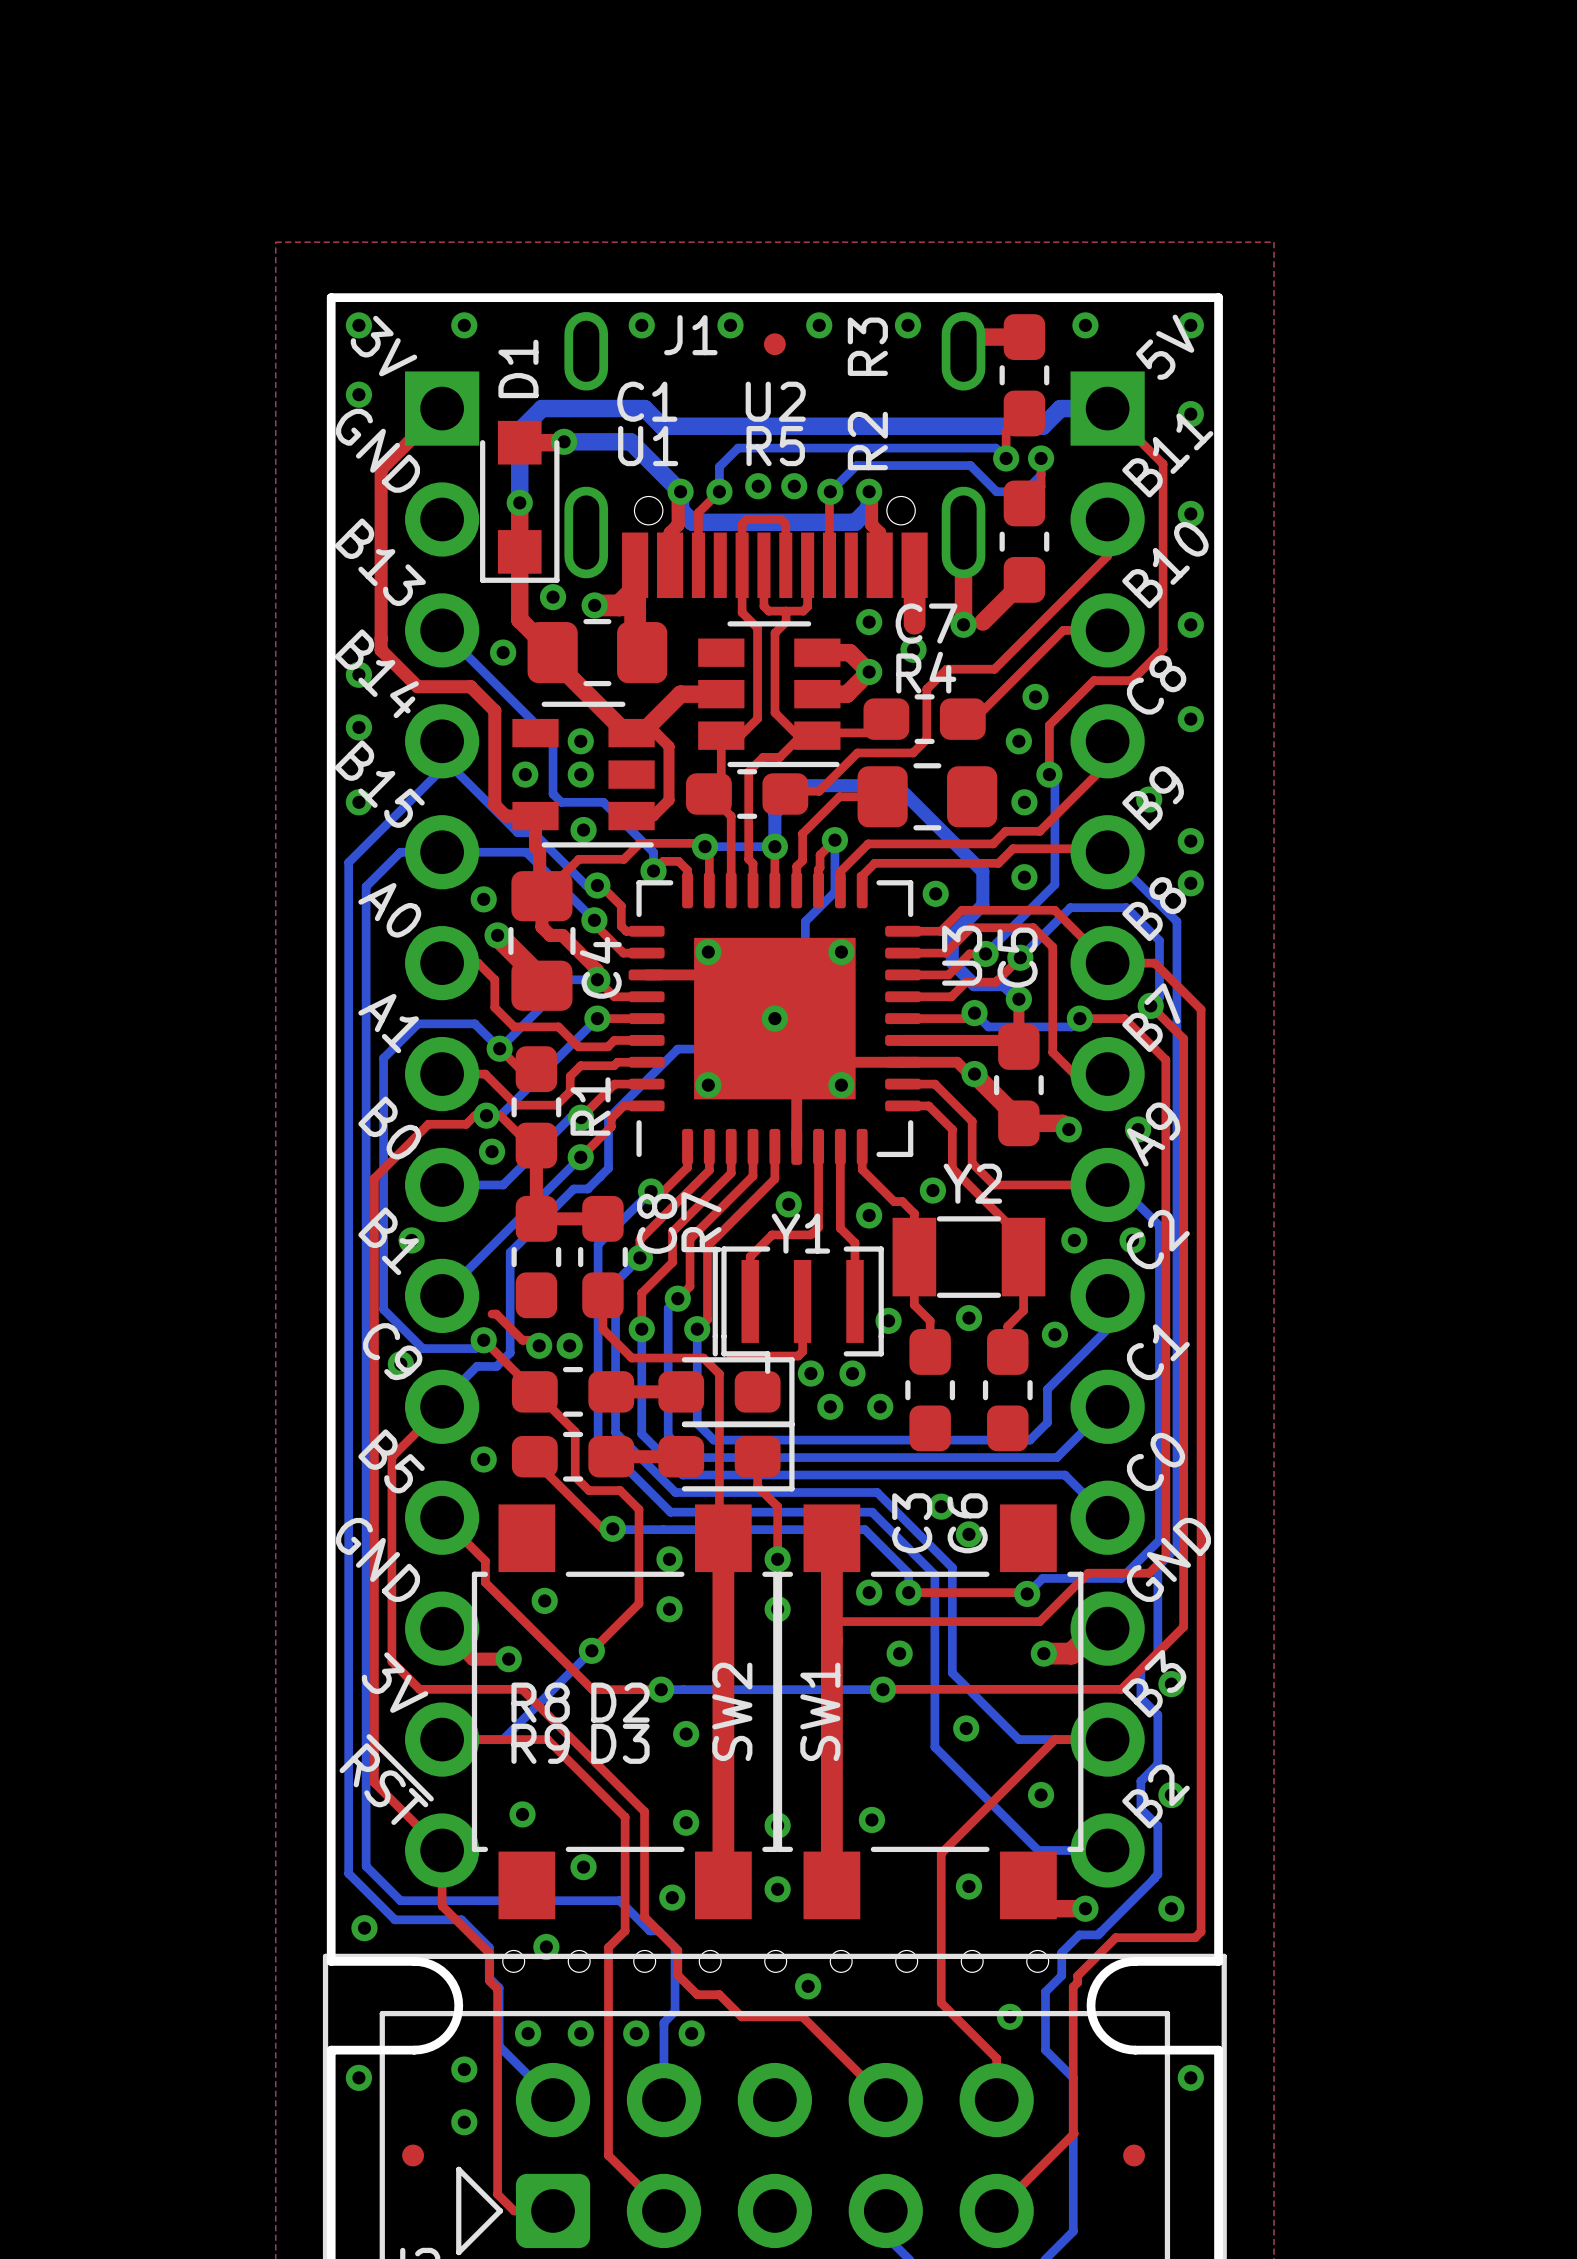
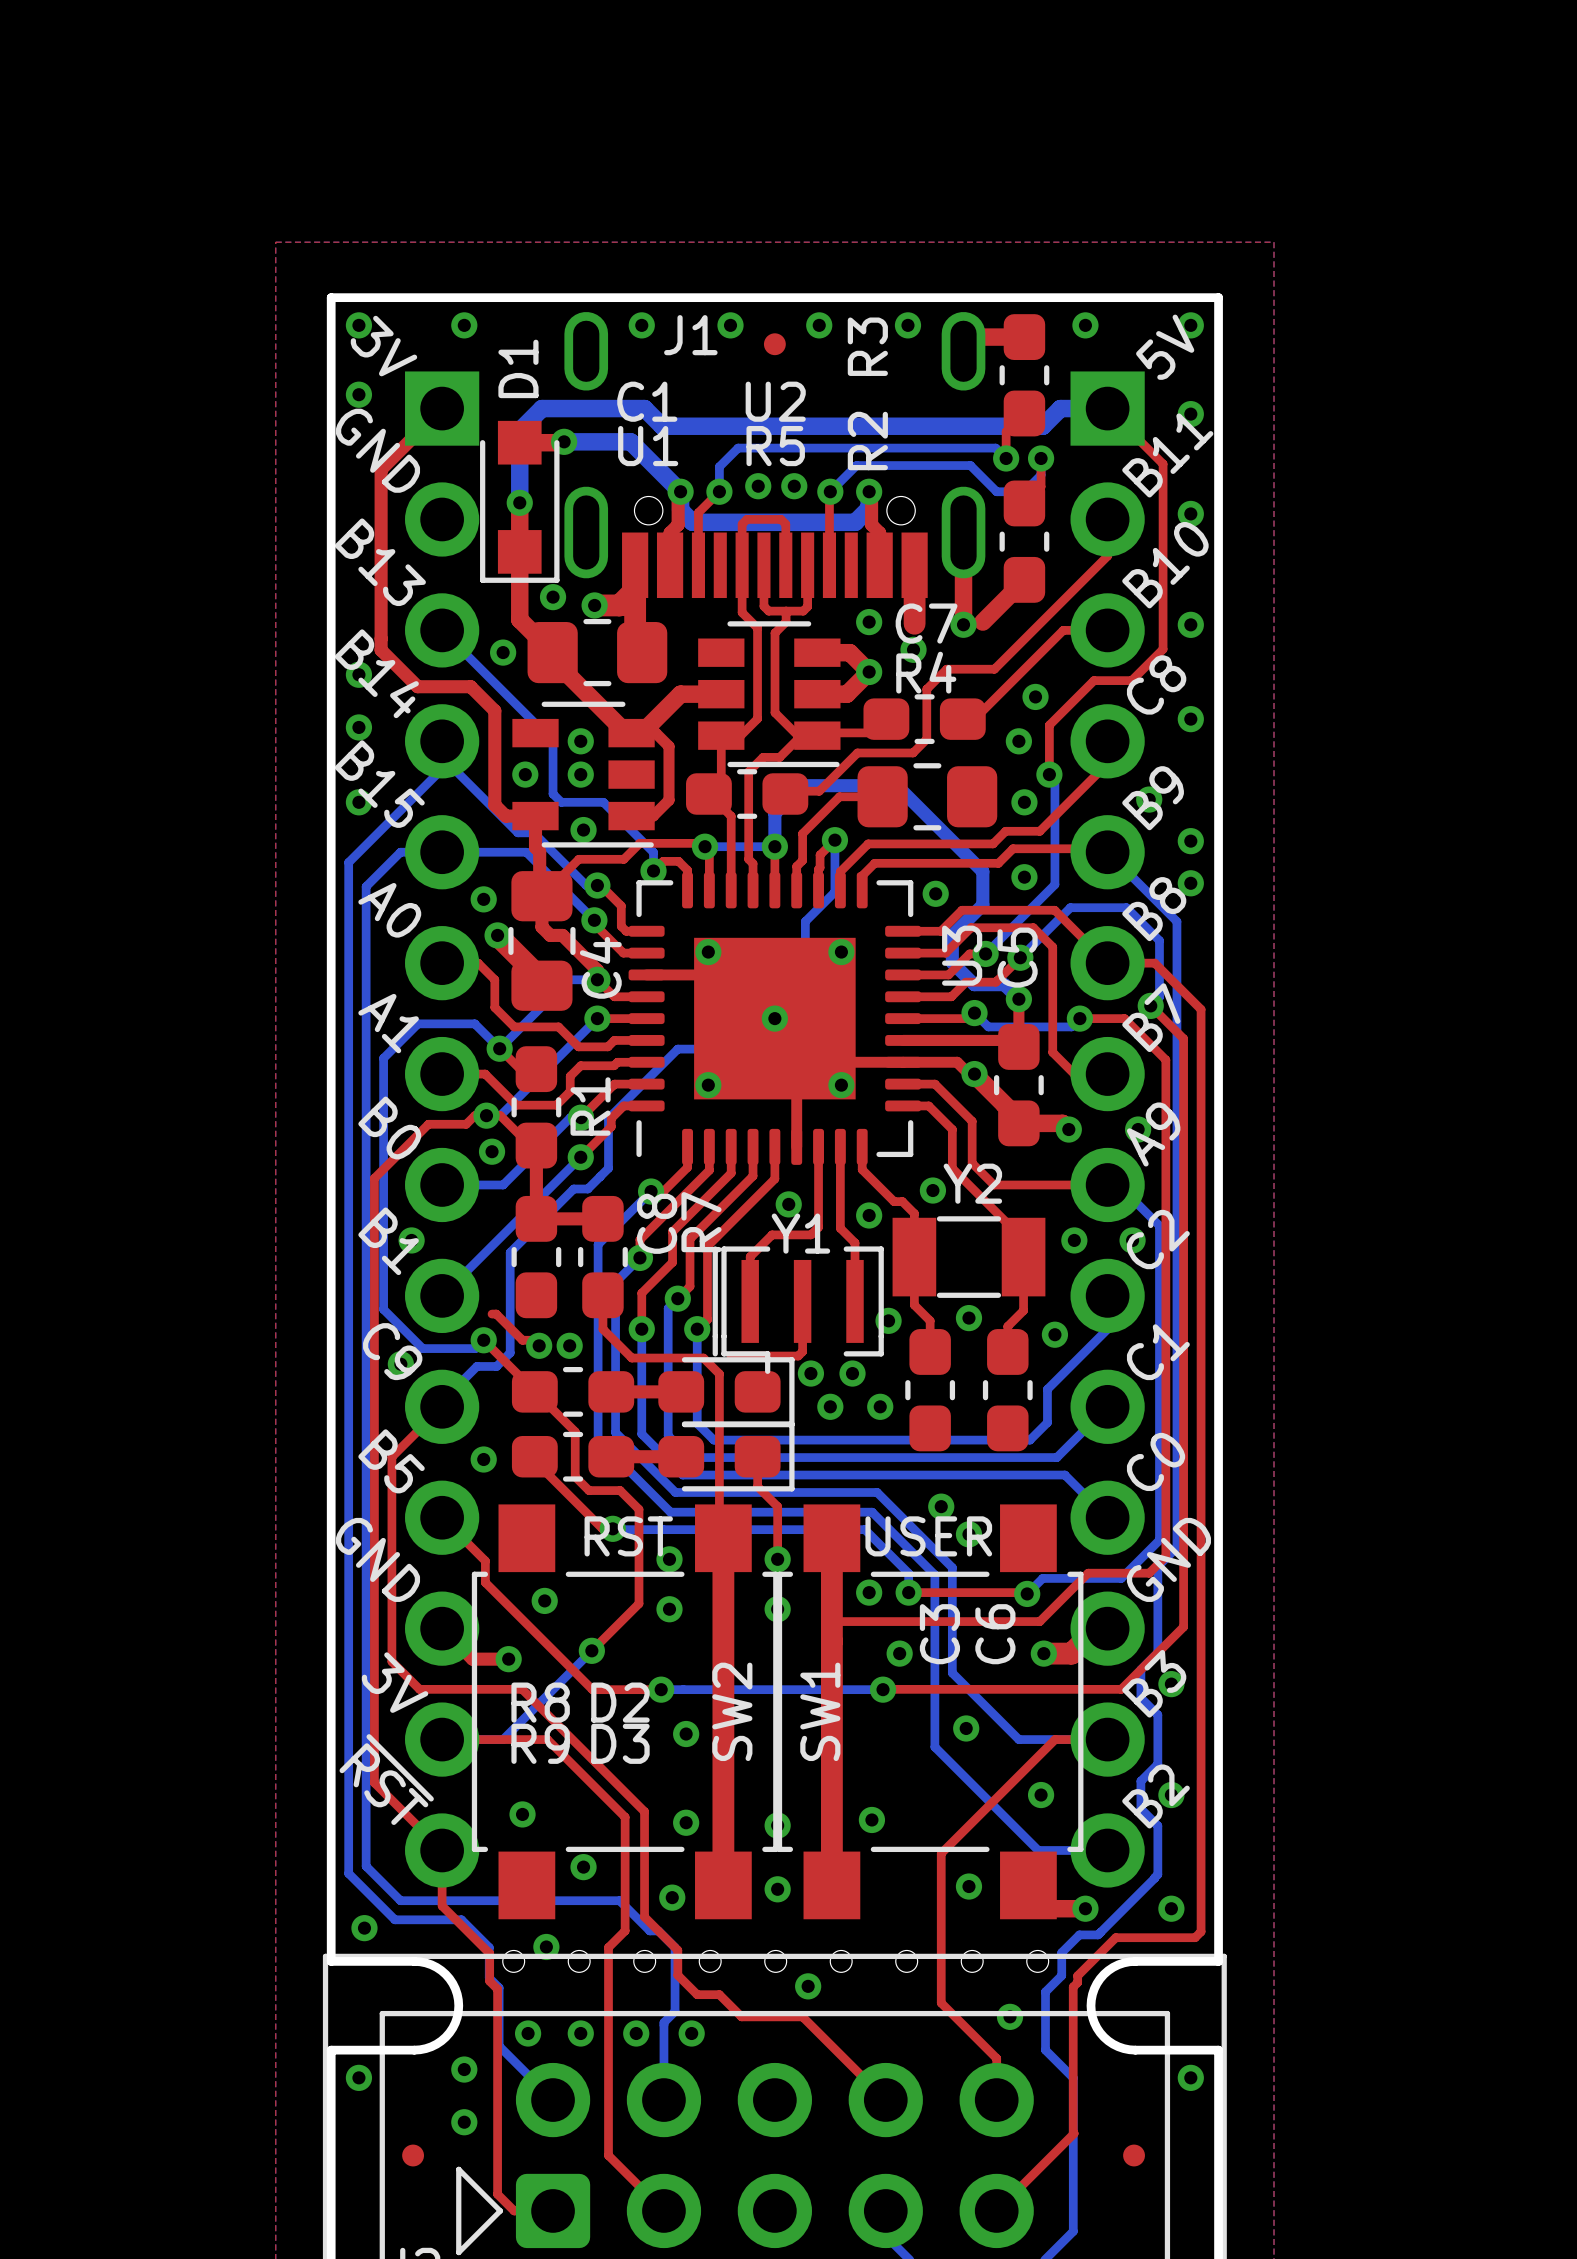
C3 name position: C3 (912, 1523) -> C3 (939, 1634)
C6 name position: C6 (967, 1523) -> C6 (995, 1634)
text: none -> RST (628, 1536)
text: none -> USER (928, 1536)

